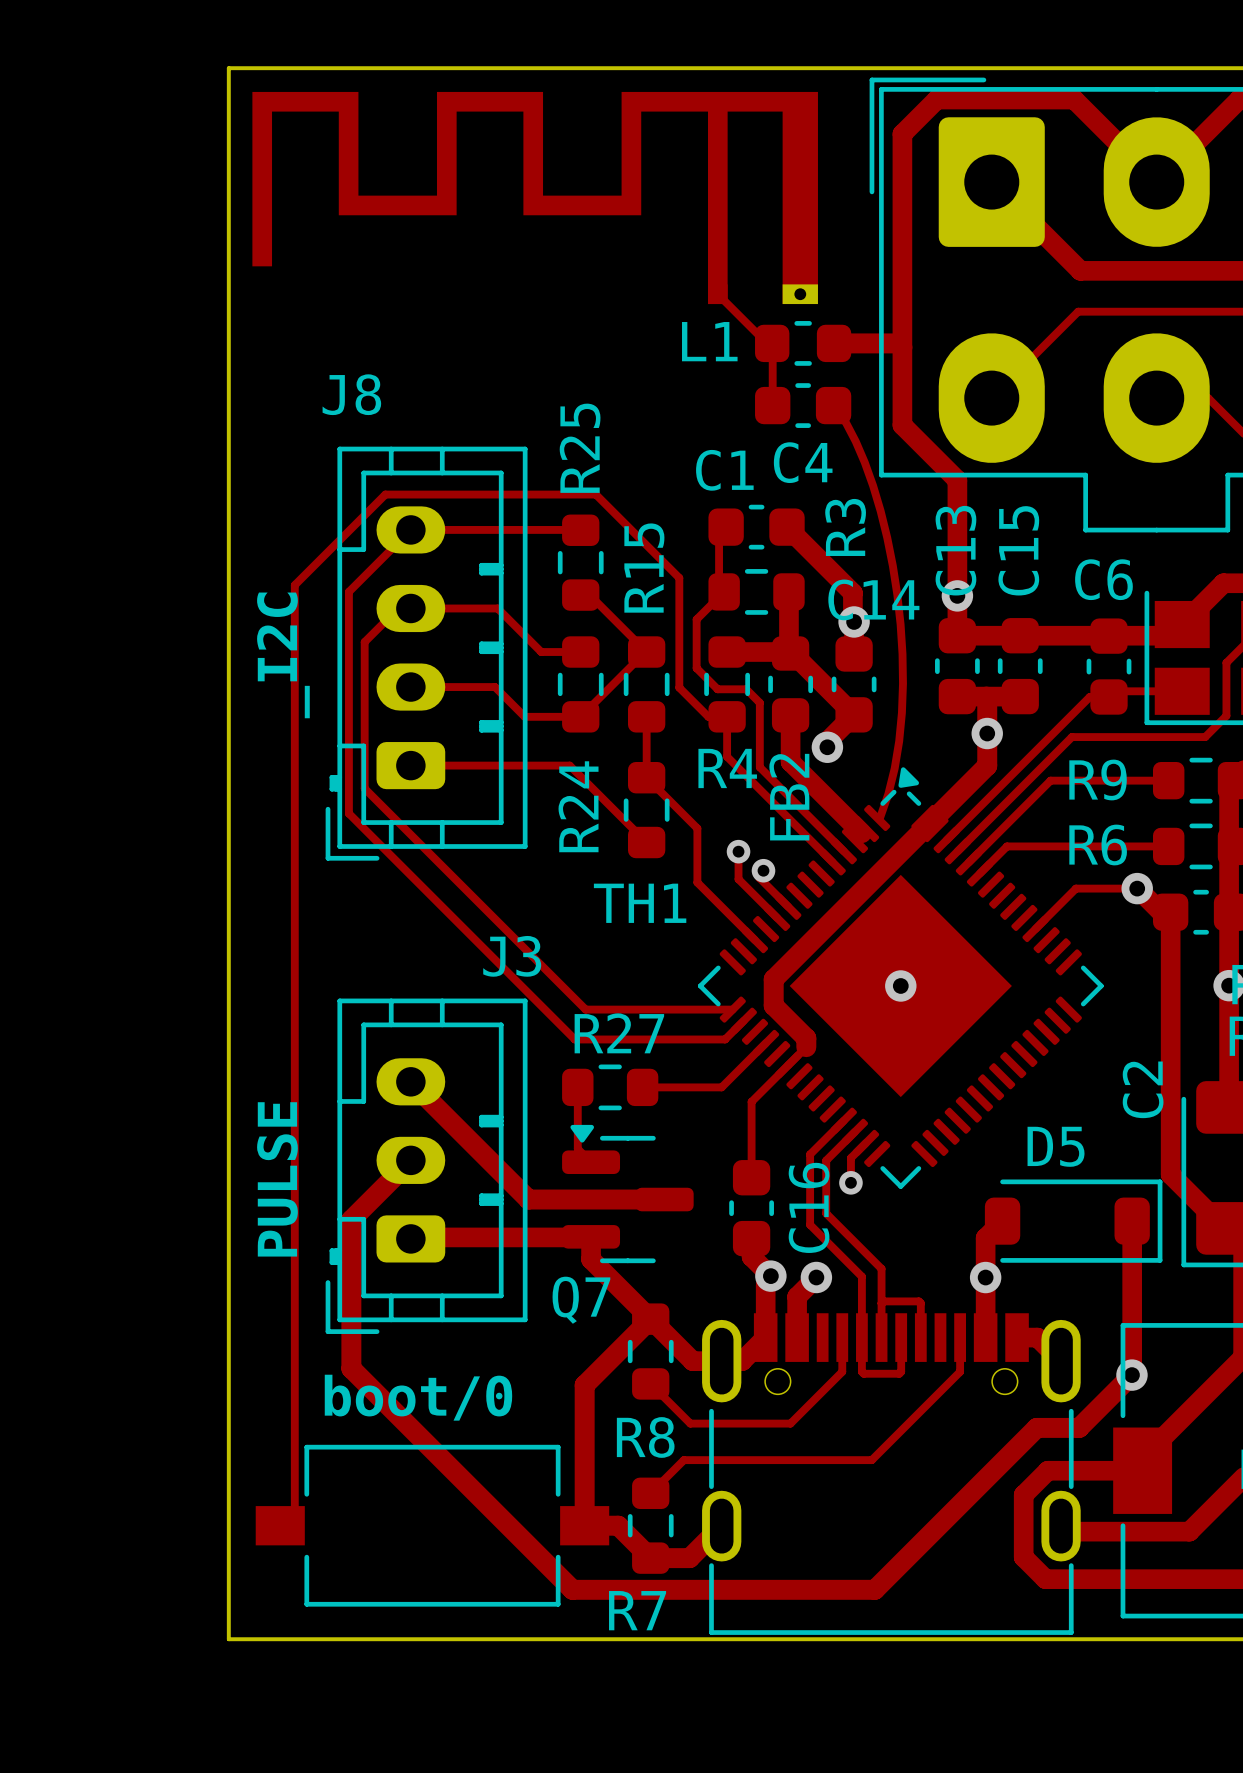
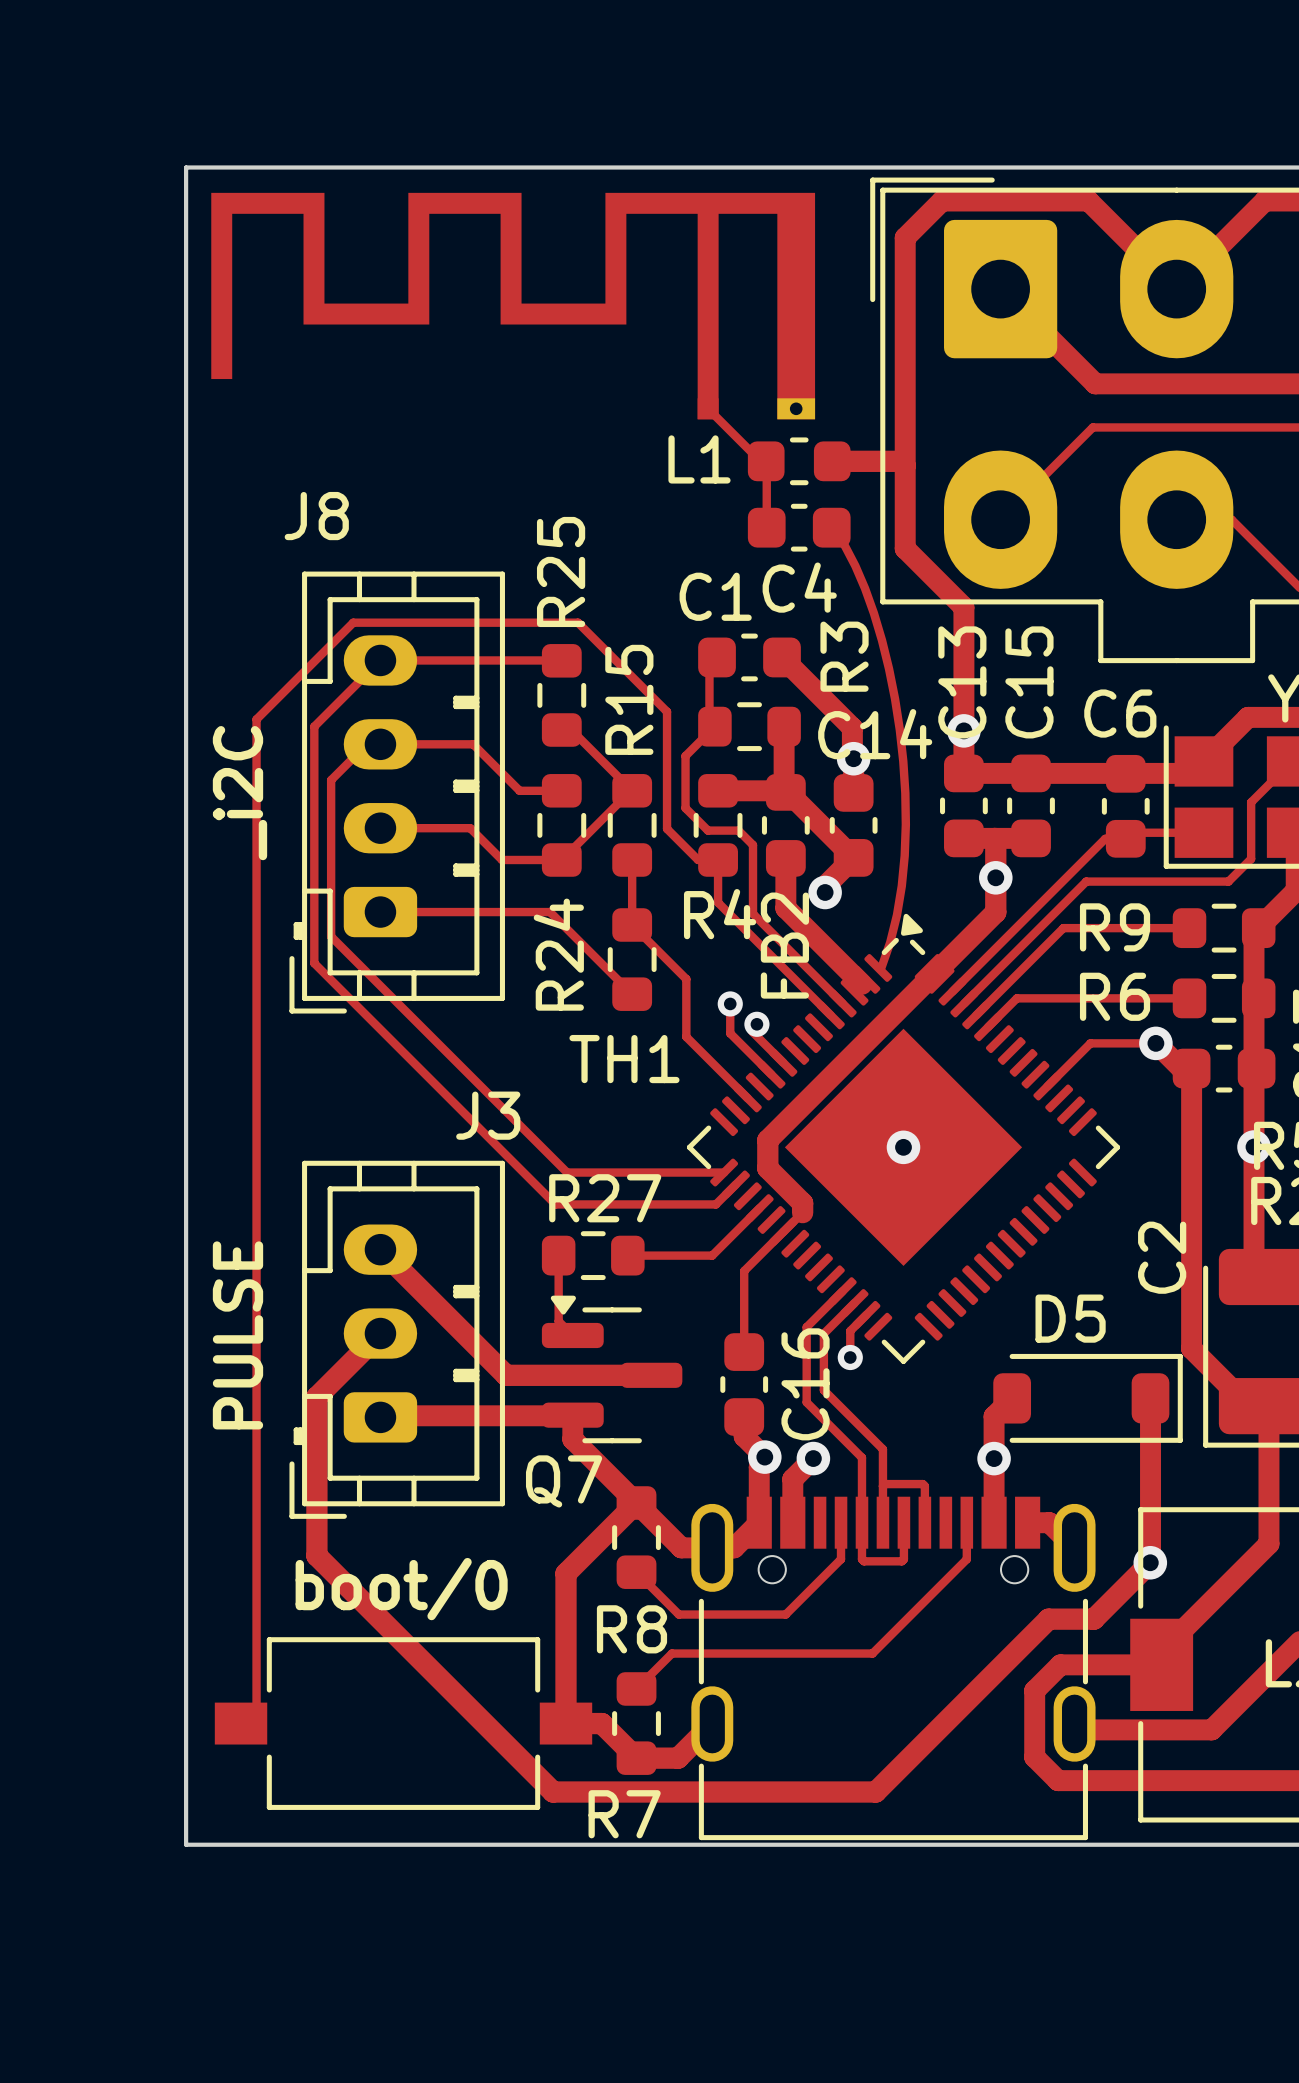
text: _I2C (283, 655) -> _i2C (239, 793)

